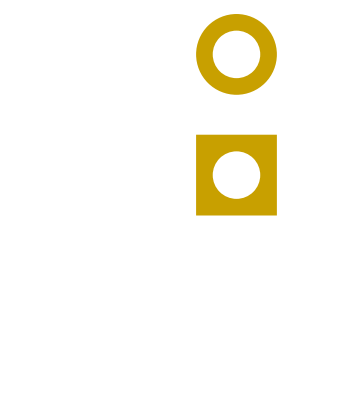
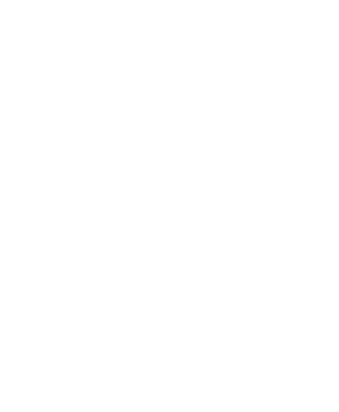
part: (236, 114) -> none

